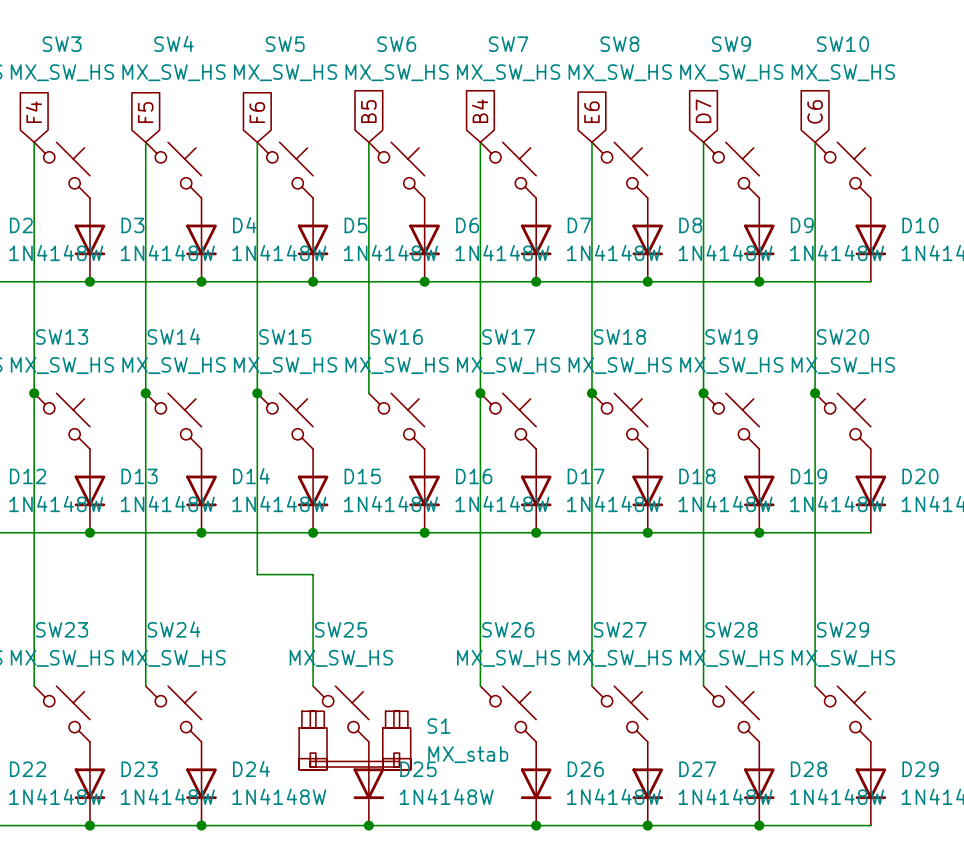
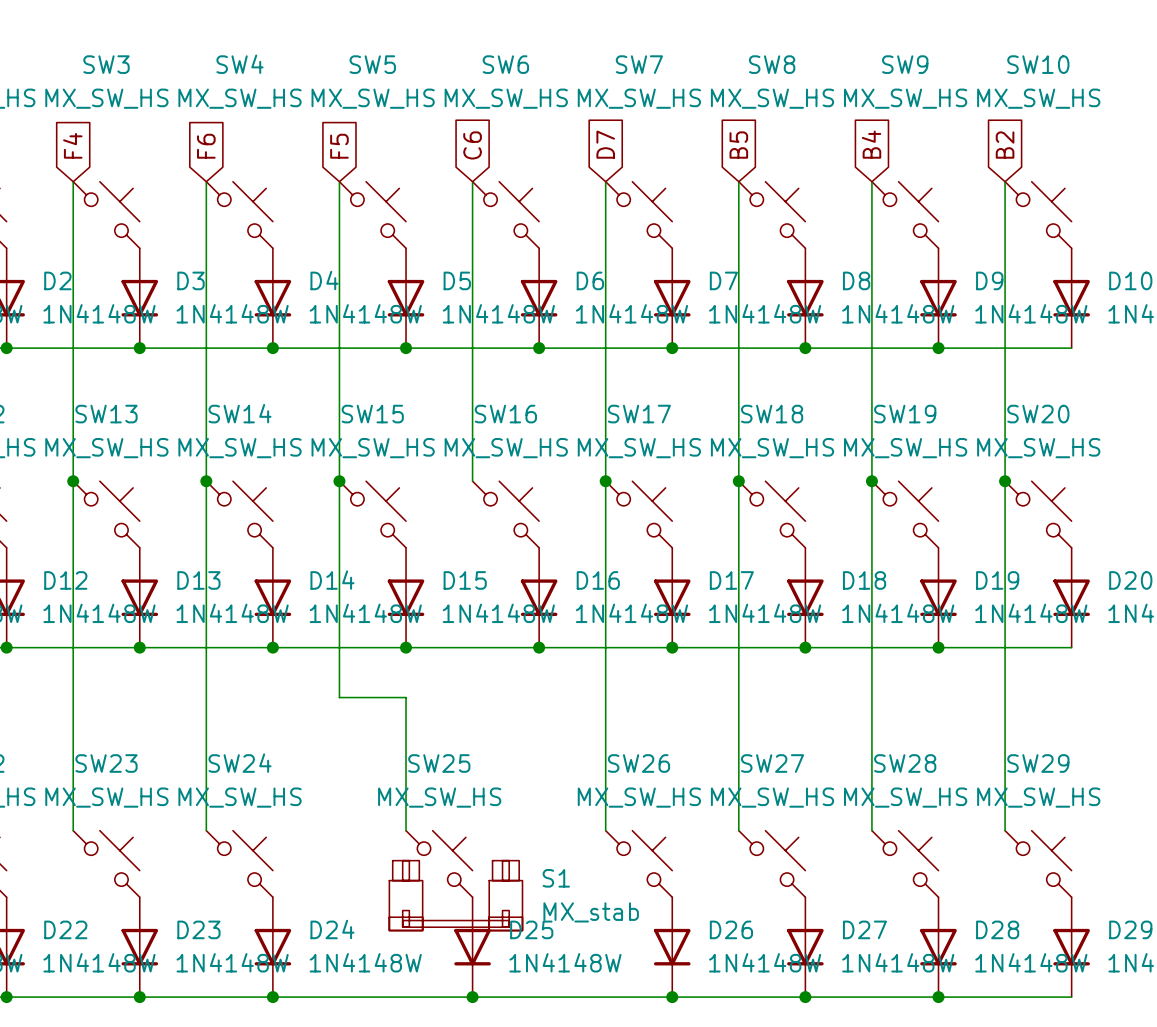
global label: B5 (368, 111) -> C6 (472, 145)
global label: B4 (480, 111) -> D7 (605, 144)
global label: D7 (703, 111) -> B4 (871, 144)
global label: C6 (815, 111) -> B2 (1005, 145)
global label: F5 (145, 112) -> F6 (206, 146)
global label: F6 (257, 112) -> F5 (339, 146)
global label: E6 (591, 112) -> B5 (738, 145)

